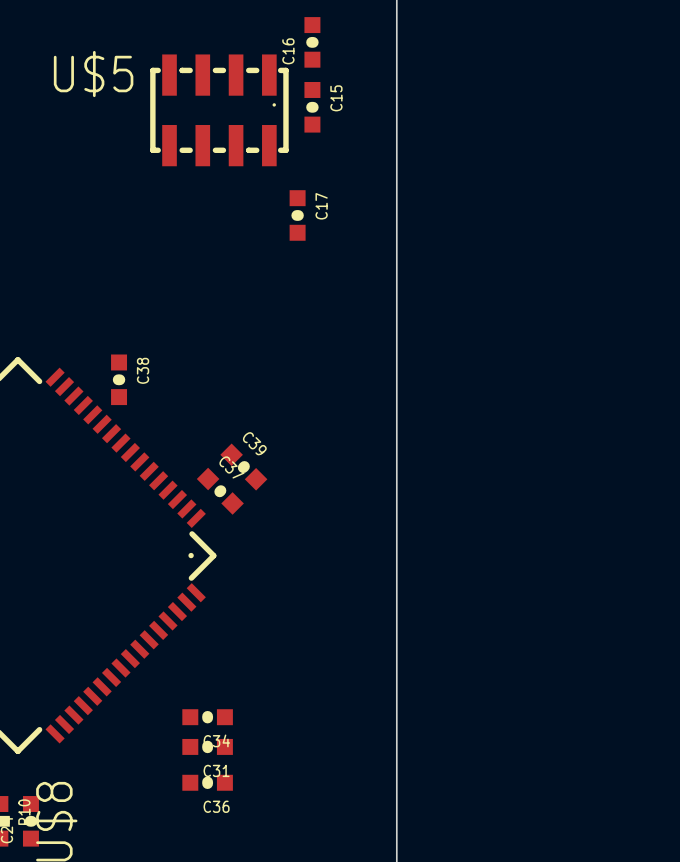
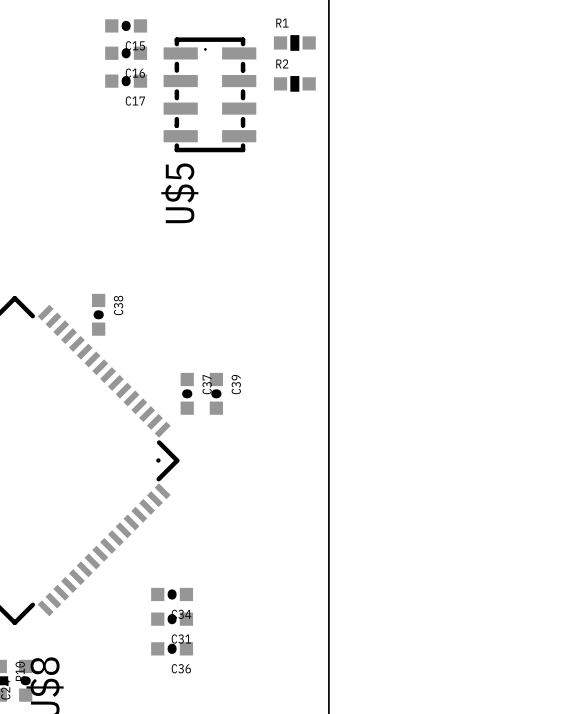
C16 rotation: 0° (312, 42) -> 90° clockwise (126, 53)
C16 position: (312, 42) -> (126, 53)
R1: none -> (294, 42)
R2: none -> (294, 83)
C15 rotation: 0° (312, 107) -> 90° clockwise (126, 25)
C15 position: (312, 107) -> (126, 25)
U$5 rotation: 0° (219, 110) -> 90° counterclockwise (209, 94)
C17 rotation: 0° (297, 215) -> 90° clockwise (126, 81)
C17 position: (297, 215) -> (126, 81)
C39 rotation: 0° (243, 467) -> 45° clockwise (216, 393)
C37 rotation: 0° (220, 491) -> 45° clockwise (187, 393)

